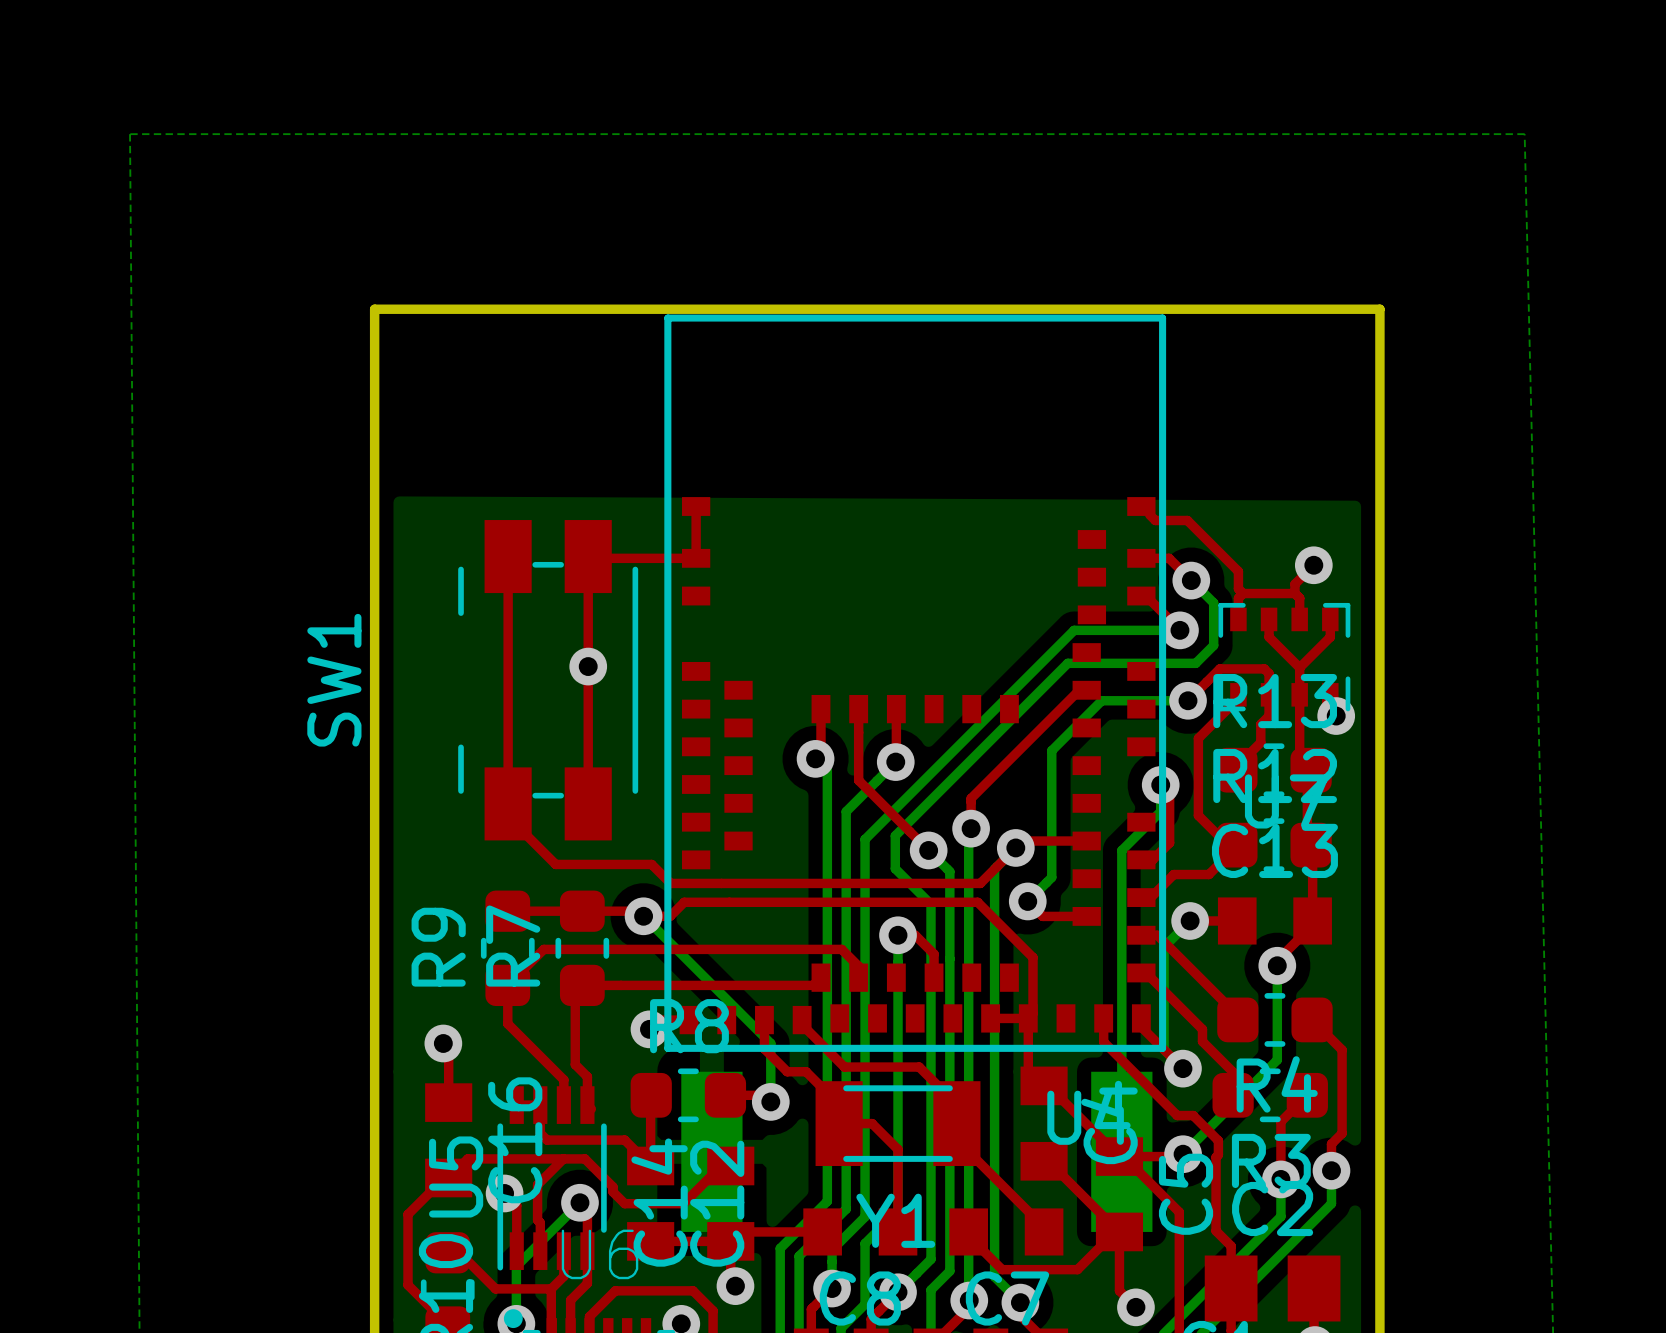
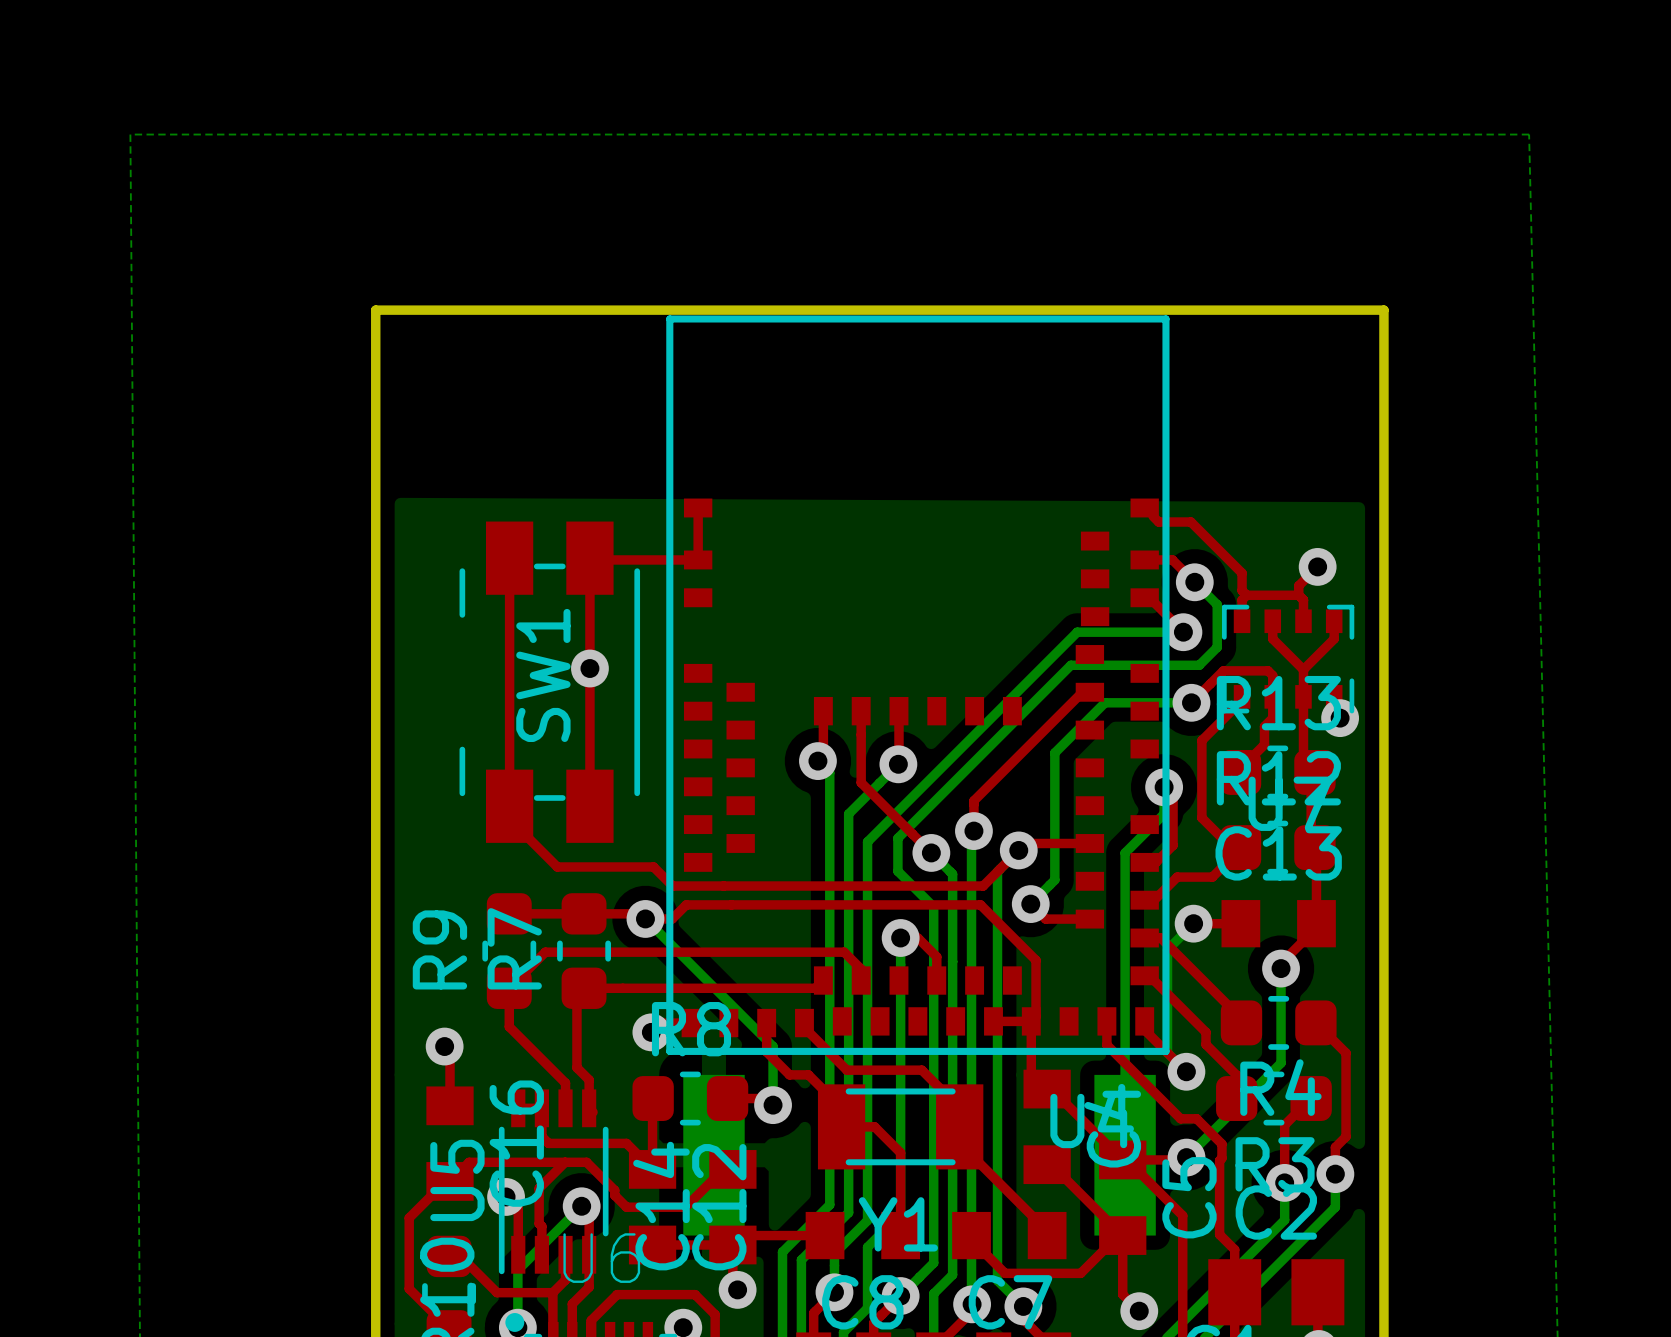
SW1 name position: SW1 (334, 680) -> SW1 (543, 675)

